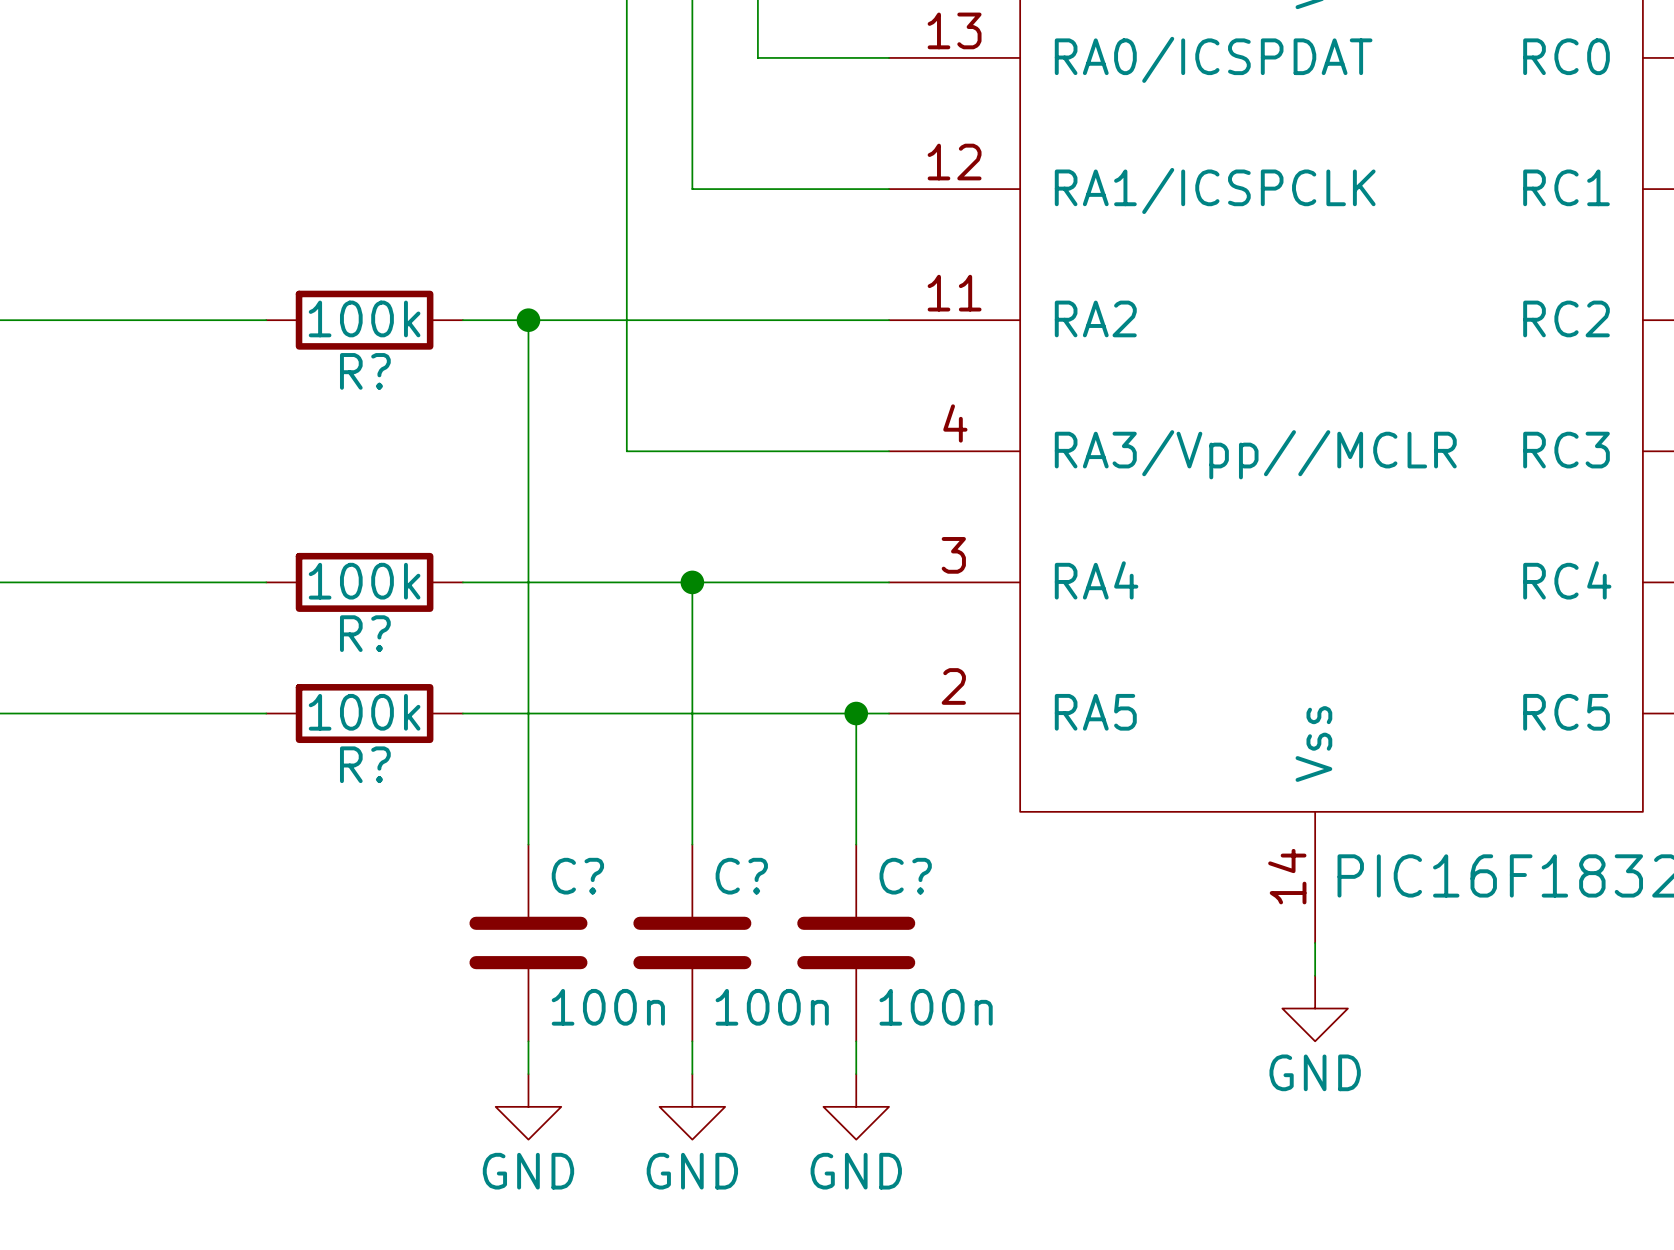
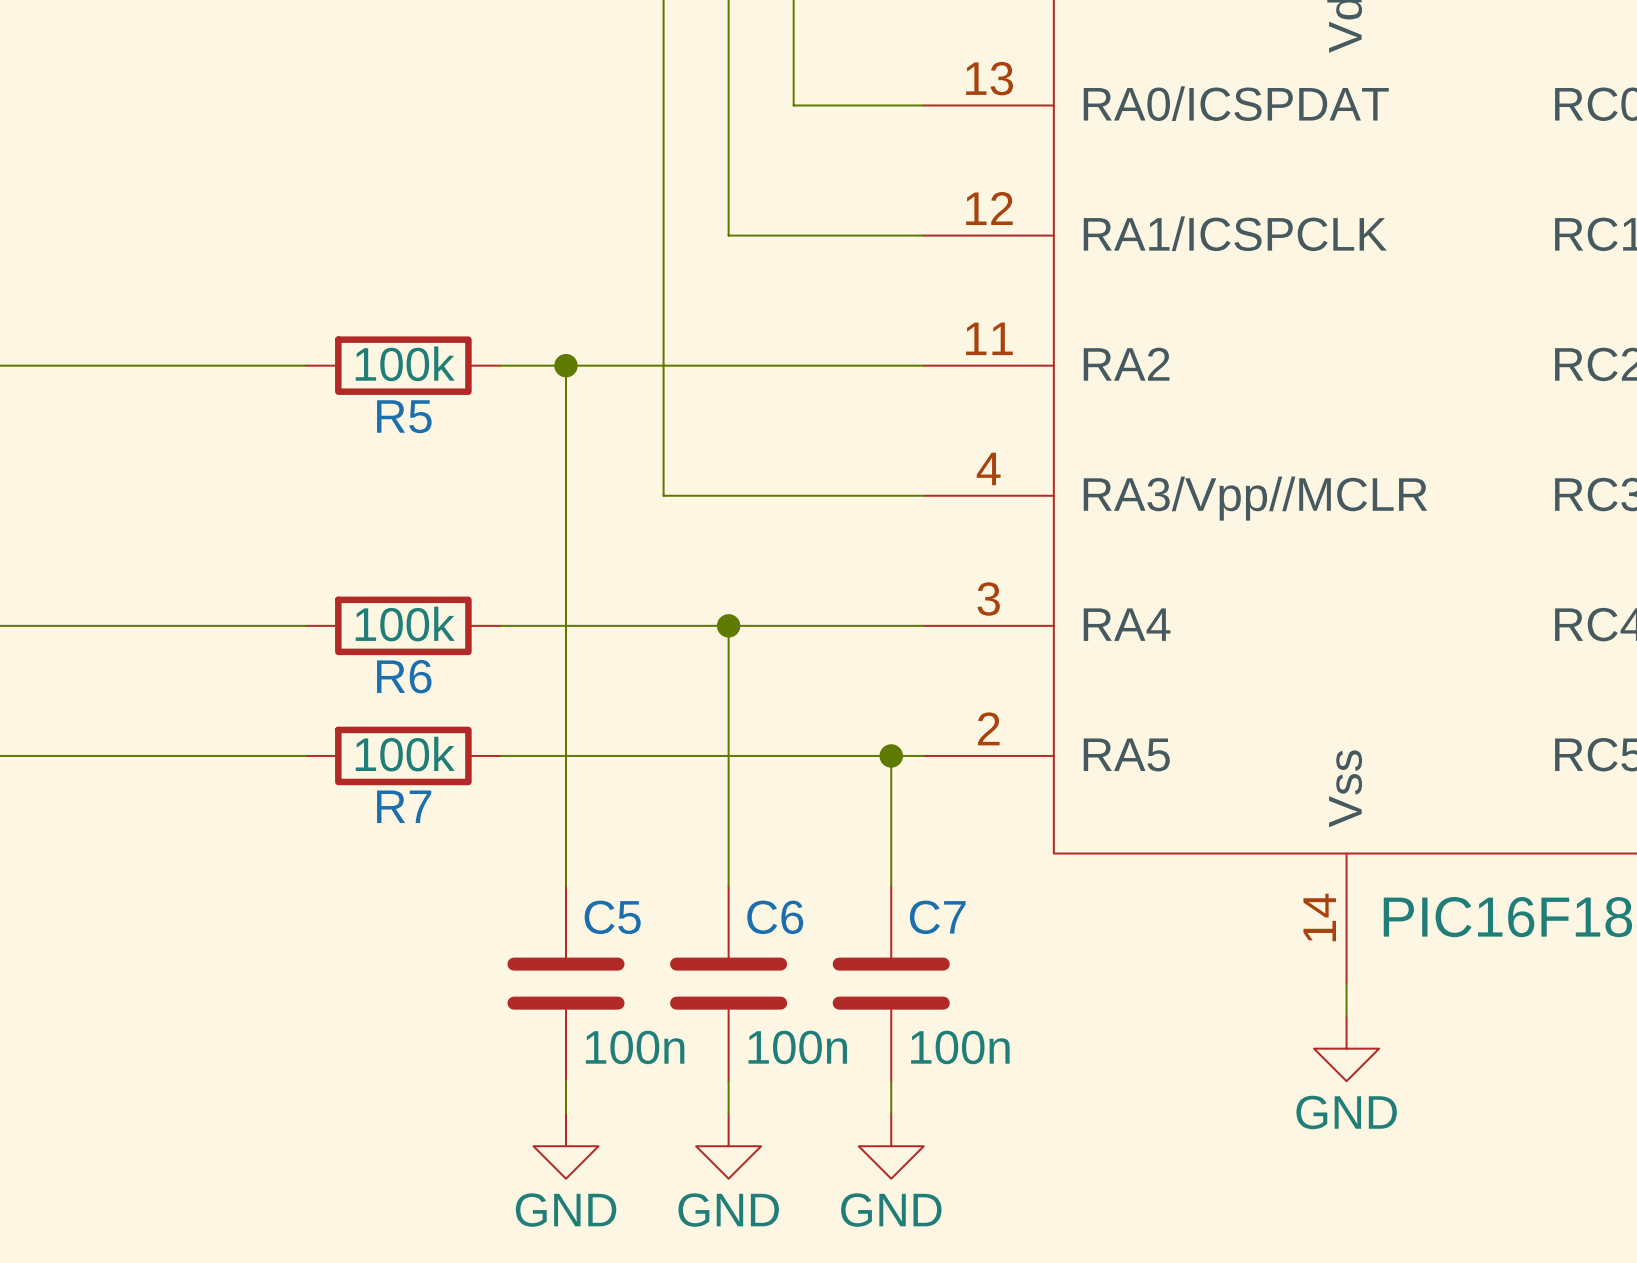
R? name: R? (365, 371) -> R5 (404, 416)
R? name: R? (365, 633) -> R6 (404, 676)
R? name: R? (365, 764) -> R7 (404, 806)
C? name: C? (577, 876) -> C5 (612, 917)
C? name: C? (741, 876) -> C6 (775, 917)
C? name: C? (905, 876) -> C7 (937, 917)

